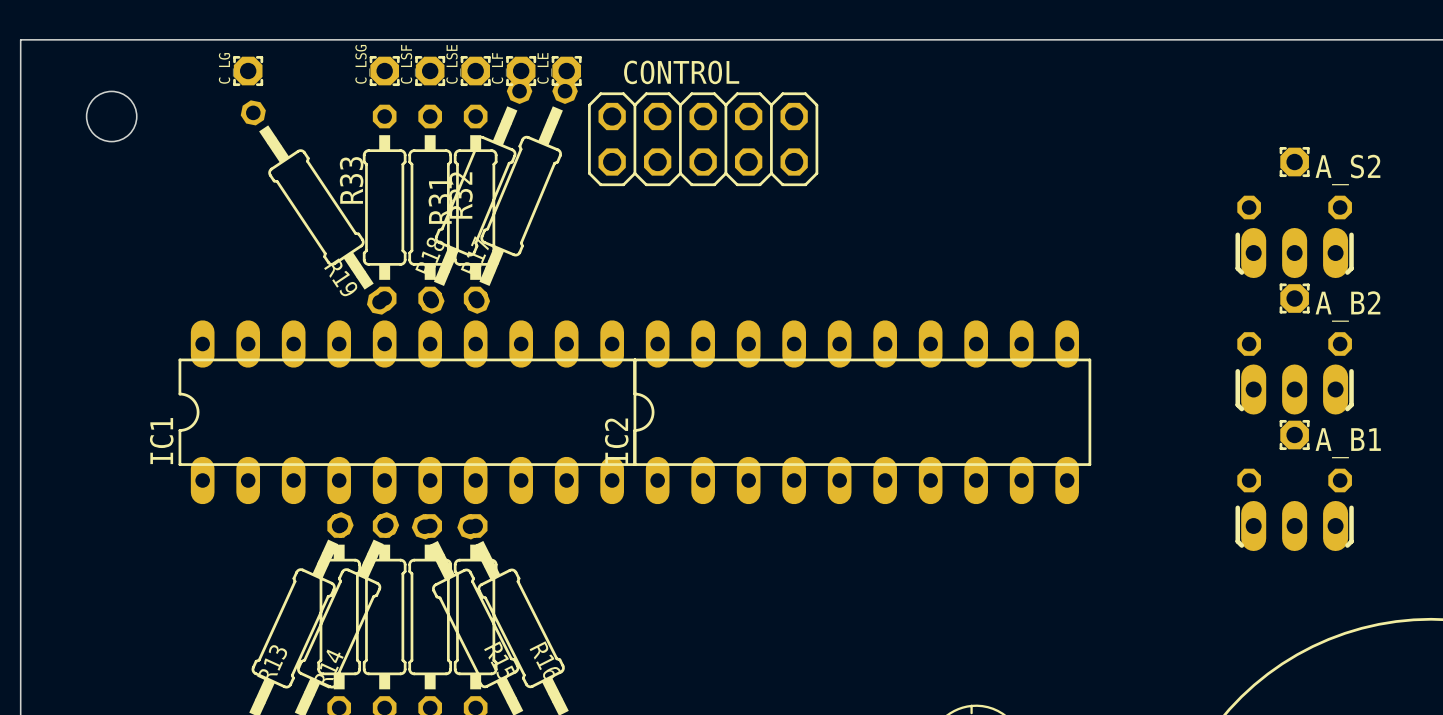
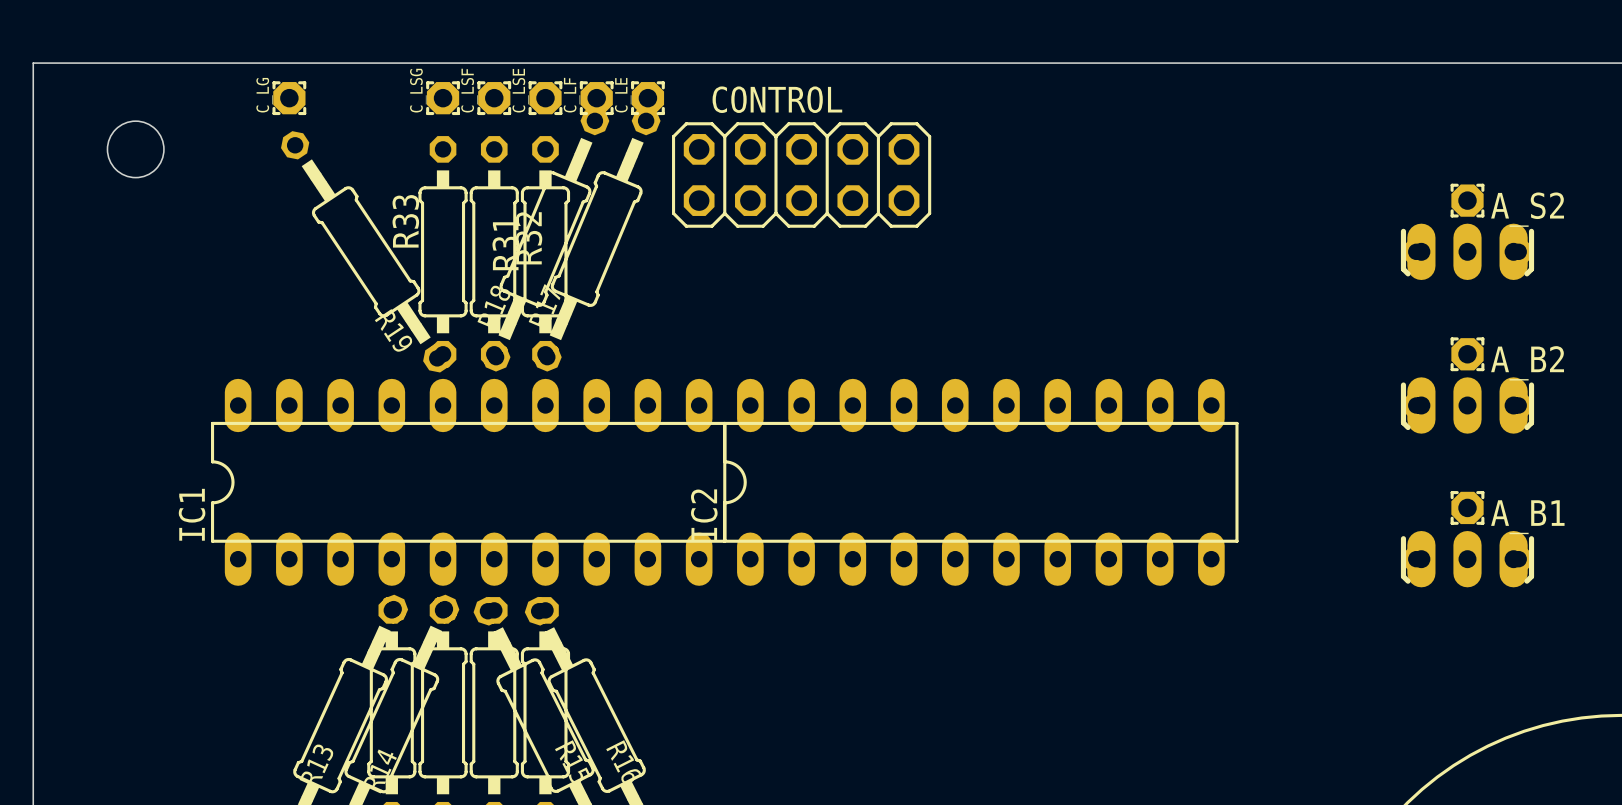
part: none -> (1467, 251)
part: (1294, 253) -> none
part: none -> (1467, 405)
part: (1294, 389) -> none
part: none -> (1467, 559)
part: (1294, 526) -> none

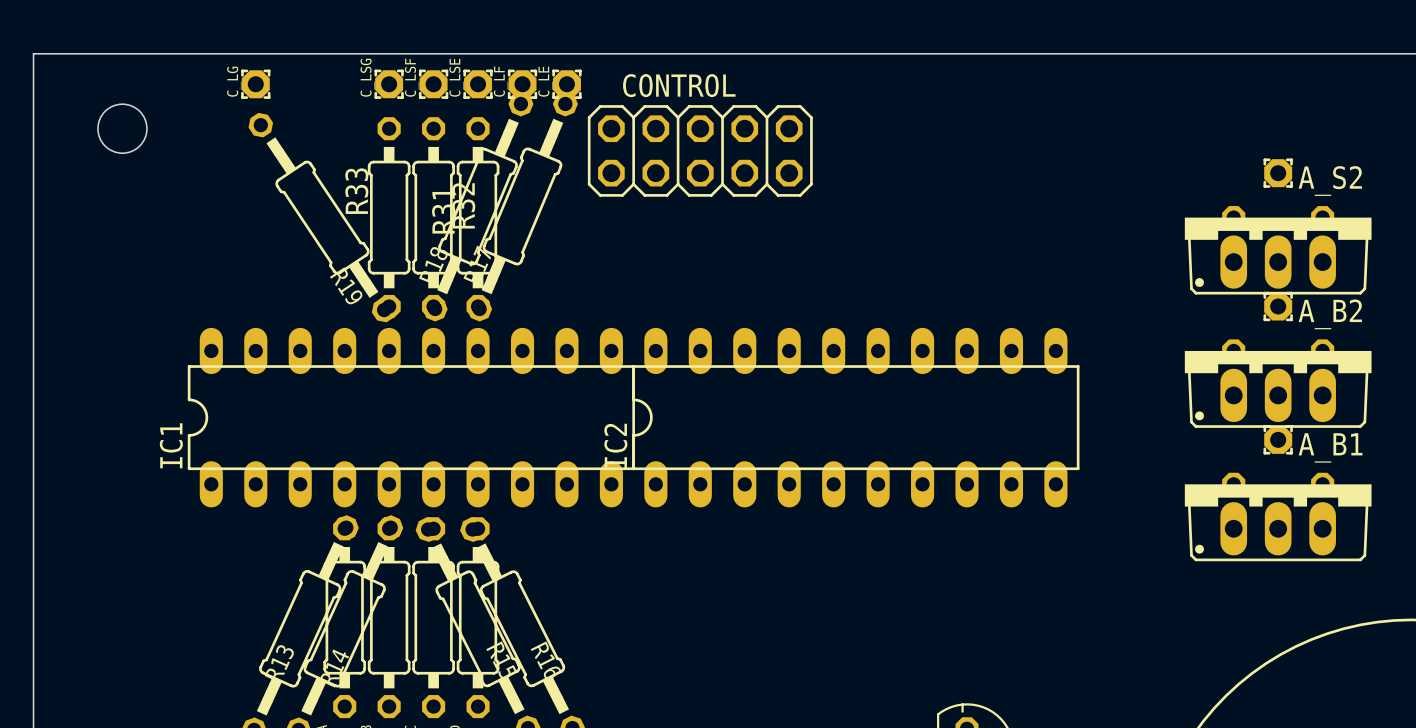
part: (1467, 251) -> none
part: none -> (1278, 256)
part: (1467, 405) -> none
part: none -> (1278, 389)
part: (1467, 559) -> none
part: none -> (1278, 522)

